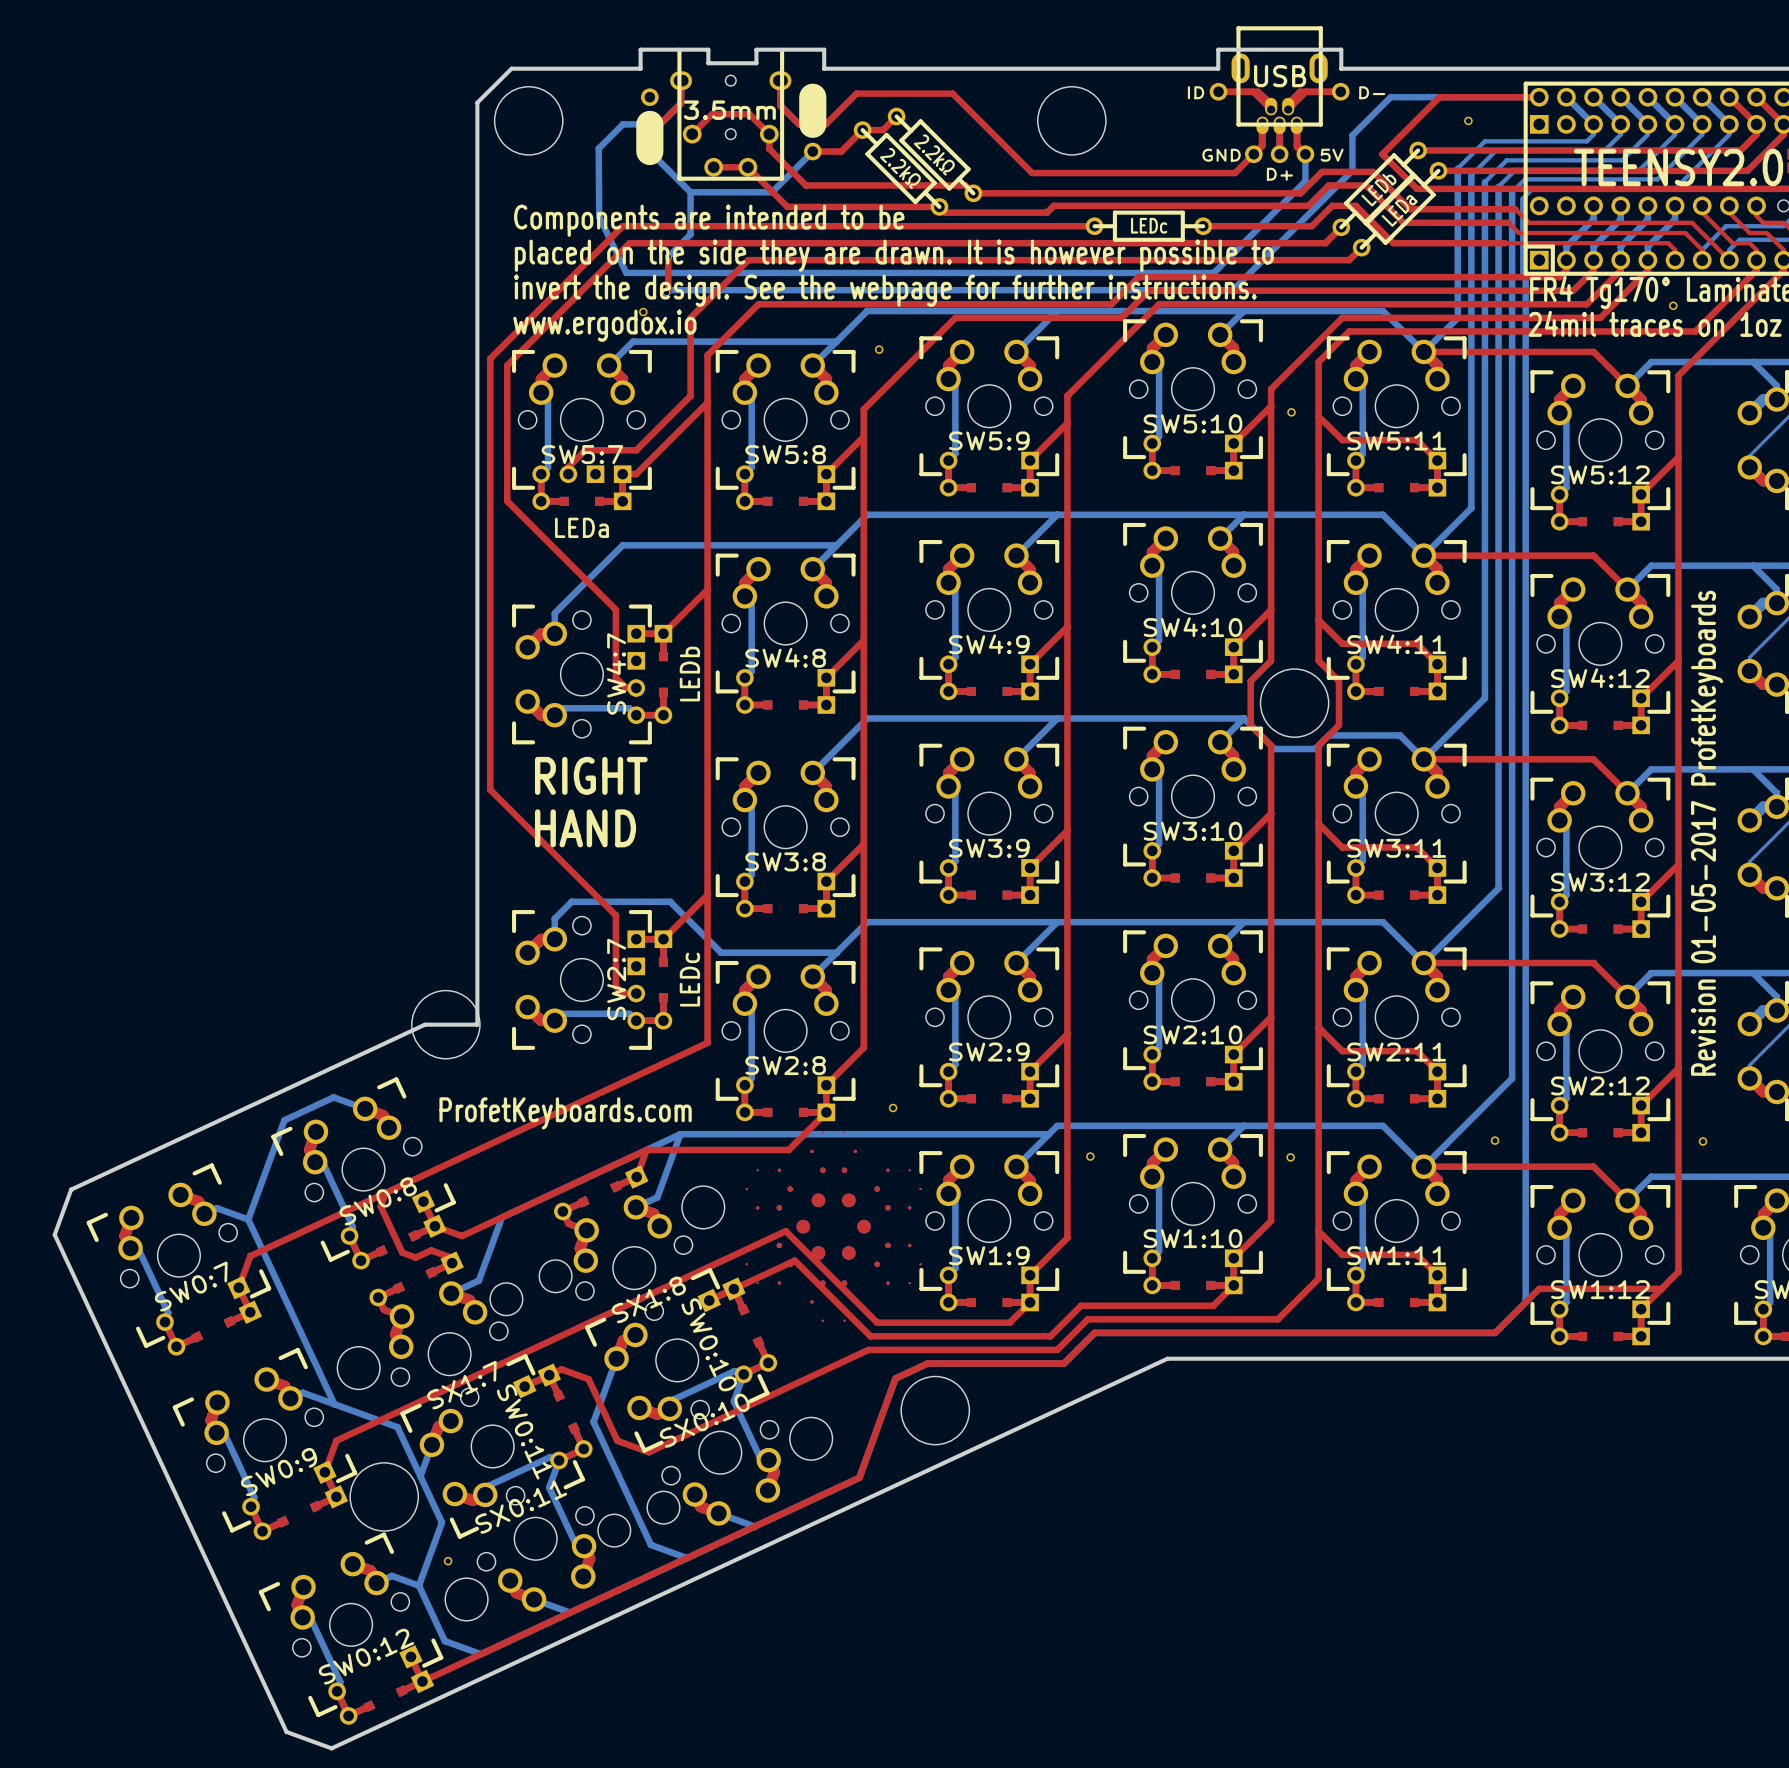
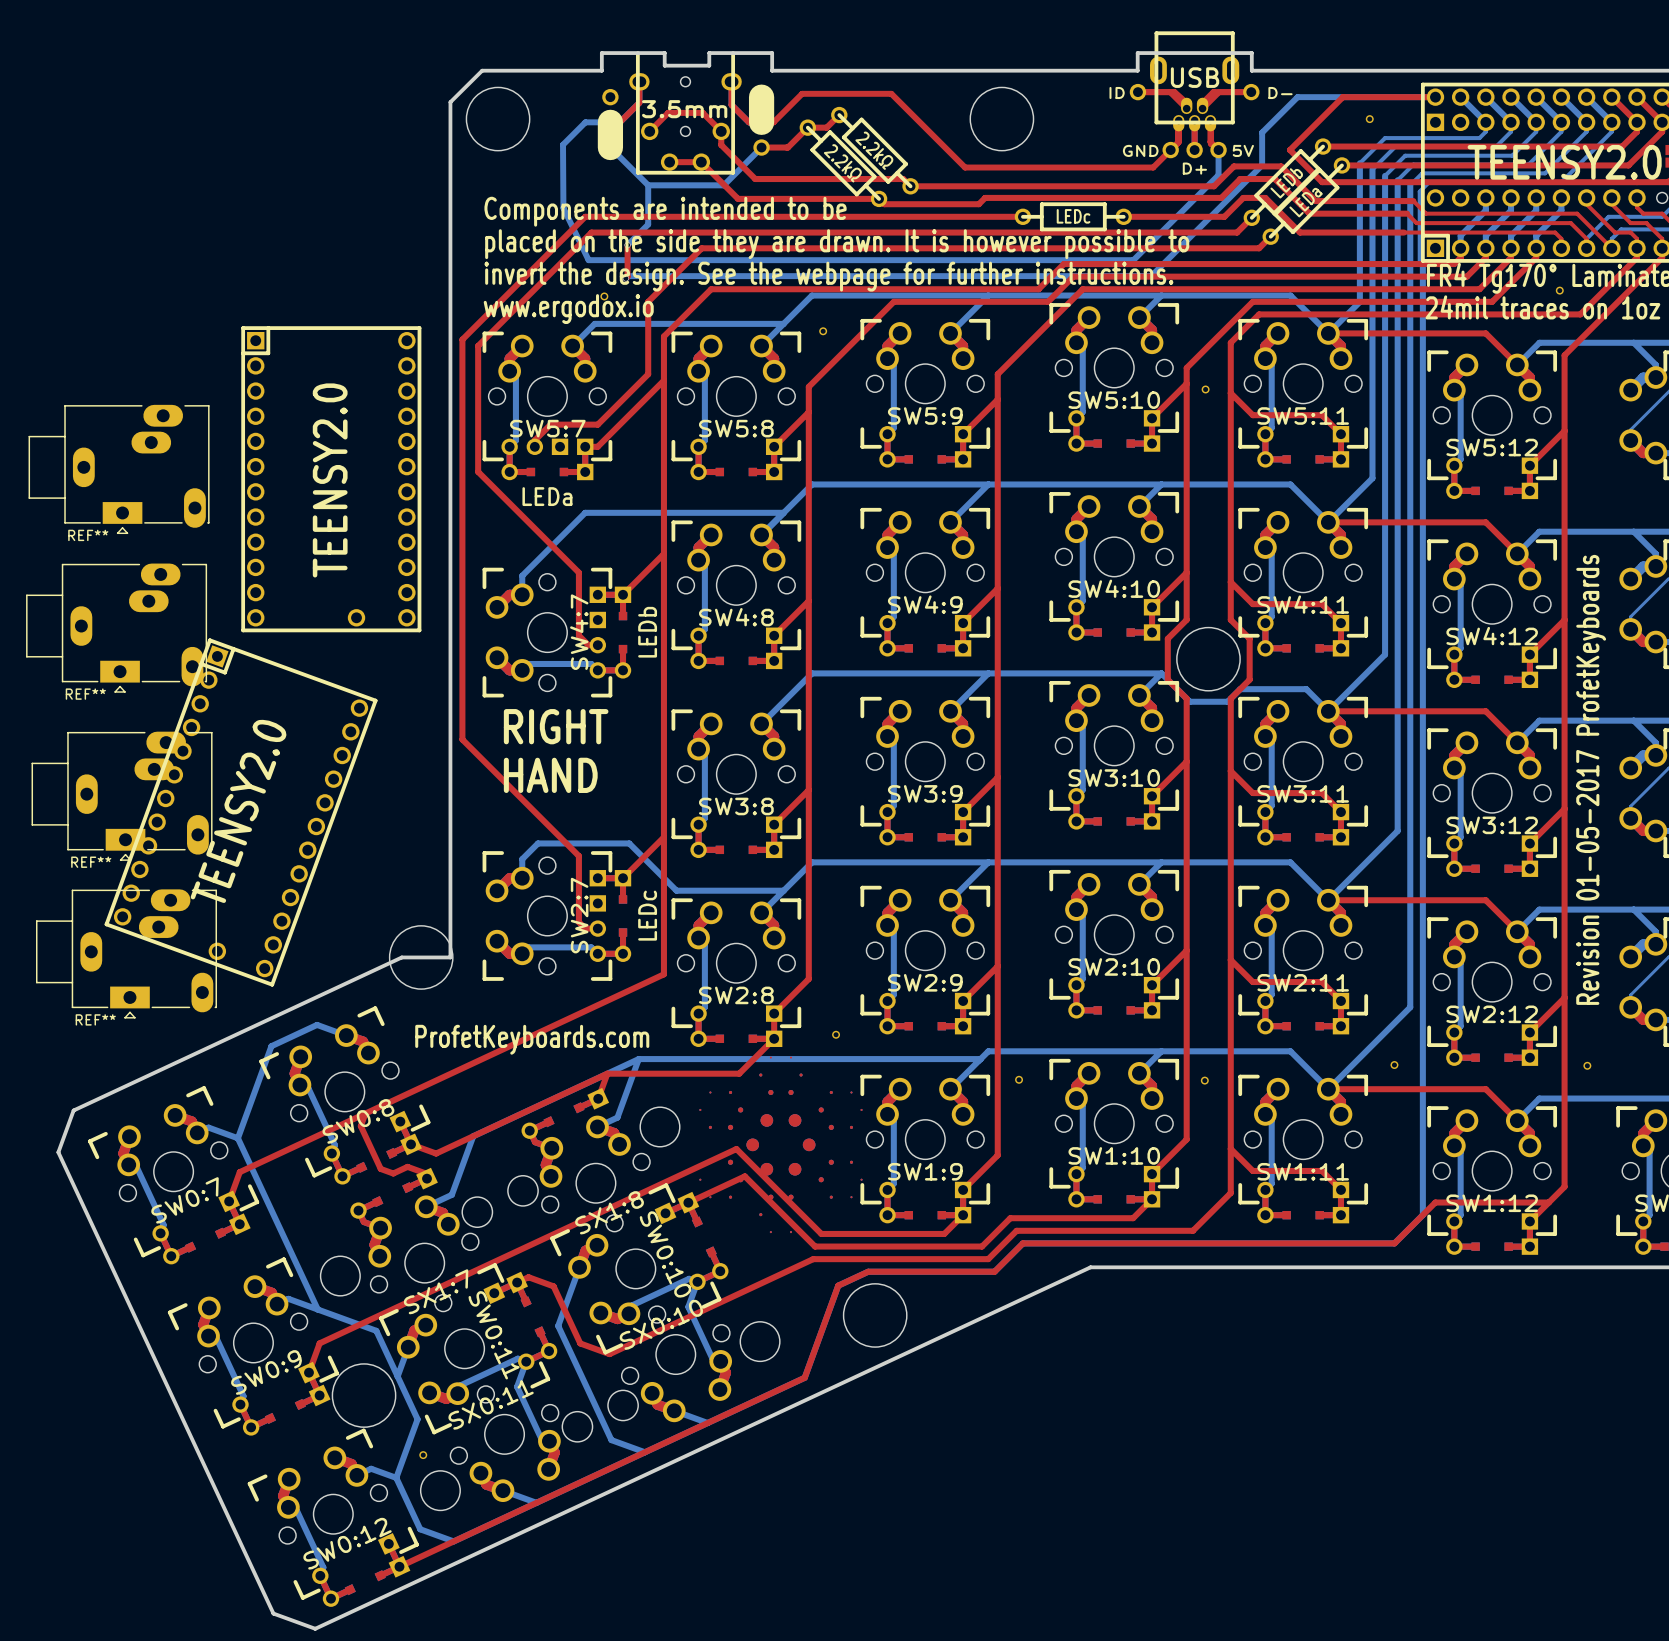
REF**: none -> (119, 469)
part: none -> TEENSY2.0 (331, 479)
REF**: none -> (116, 628)
REF**: none -> (122, 796)
part: none -> TEENSY2.0 (241, 812)
REF**: none -> (126, 953)

